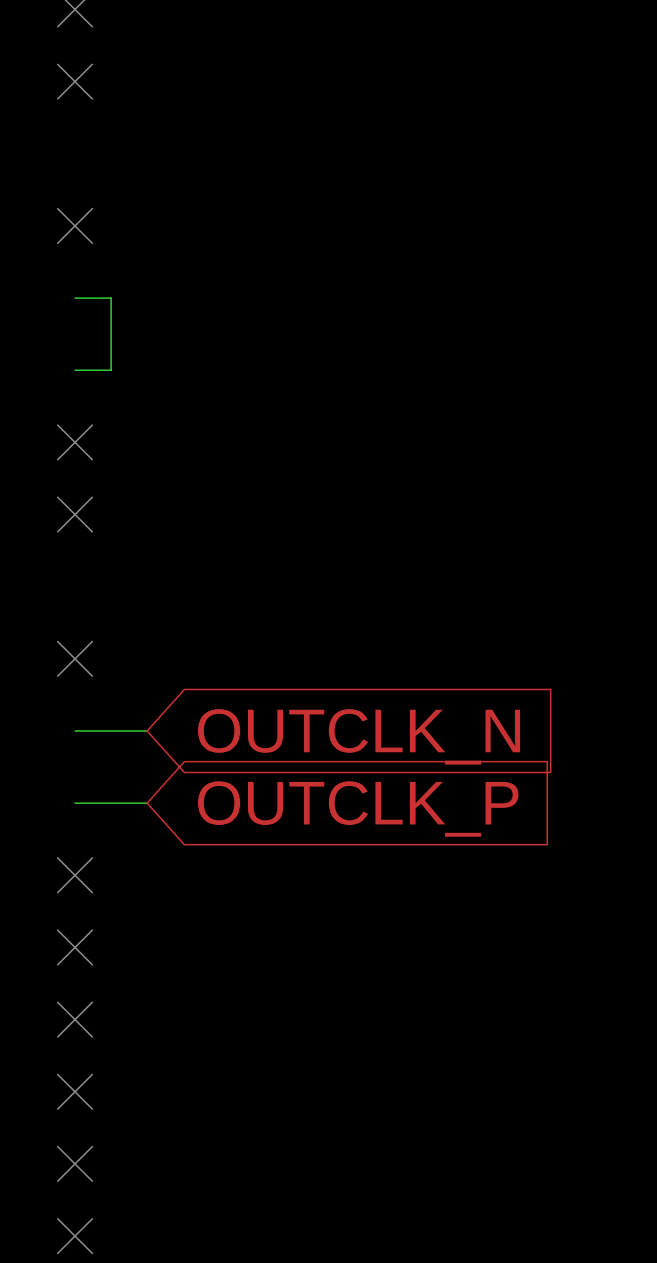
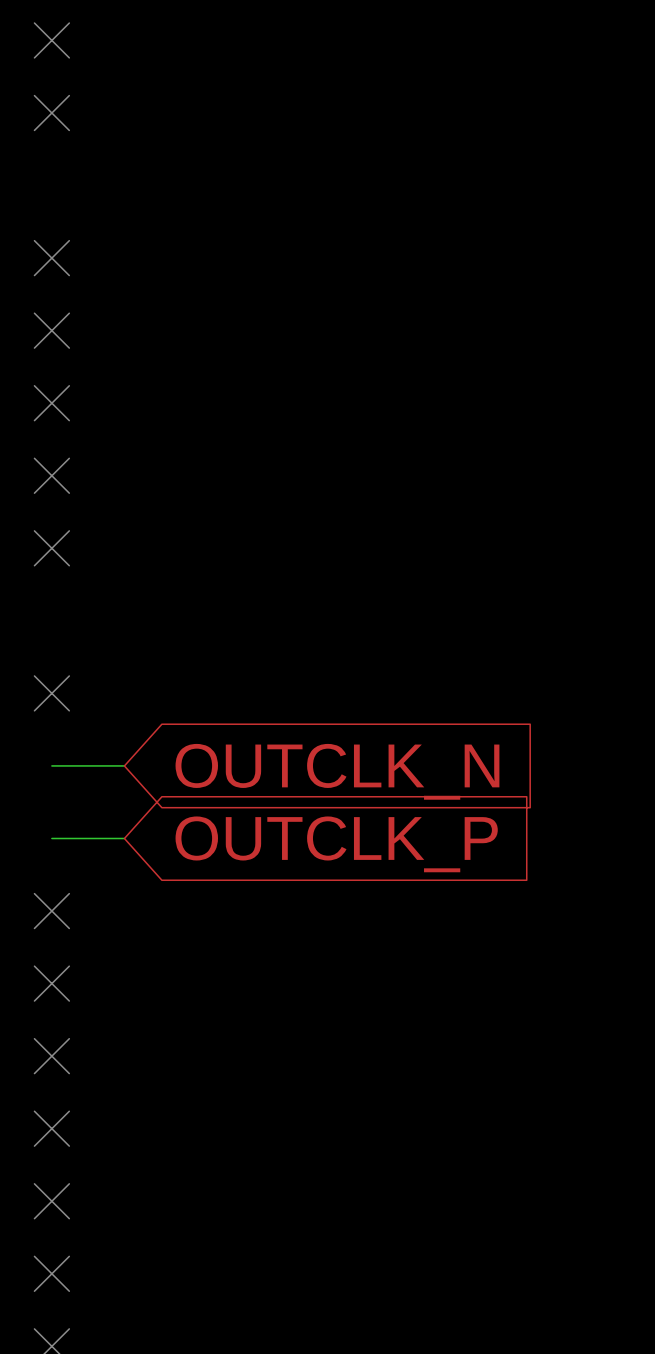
wire: (75, 298) (111, 298) (111, 370) (75, 370) -> none
no-connect mark: none -> (51, 330)
no-connect mark: none -> (51, 403)

